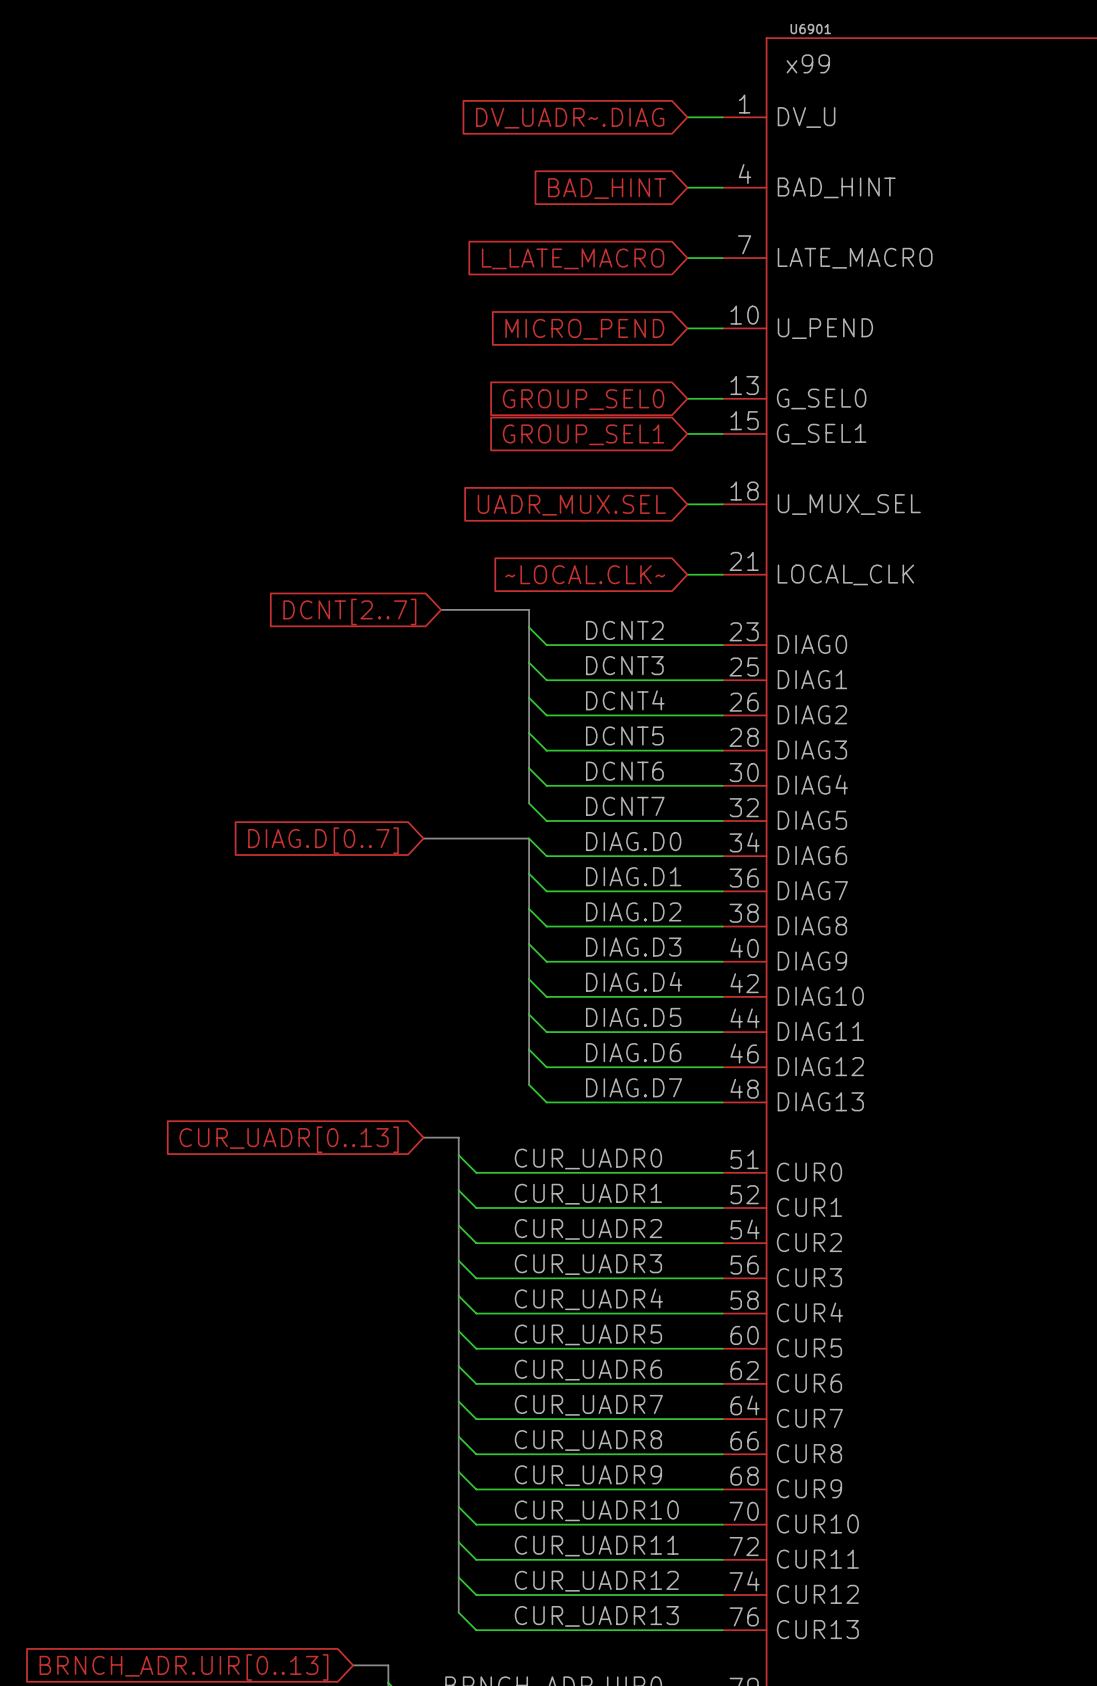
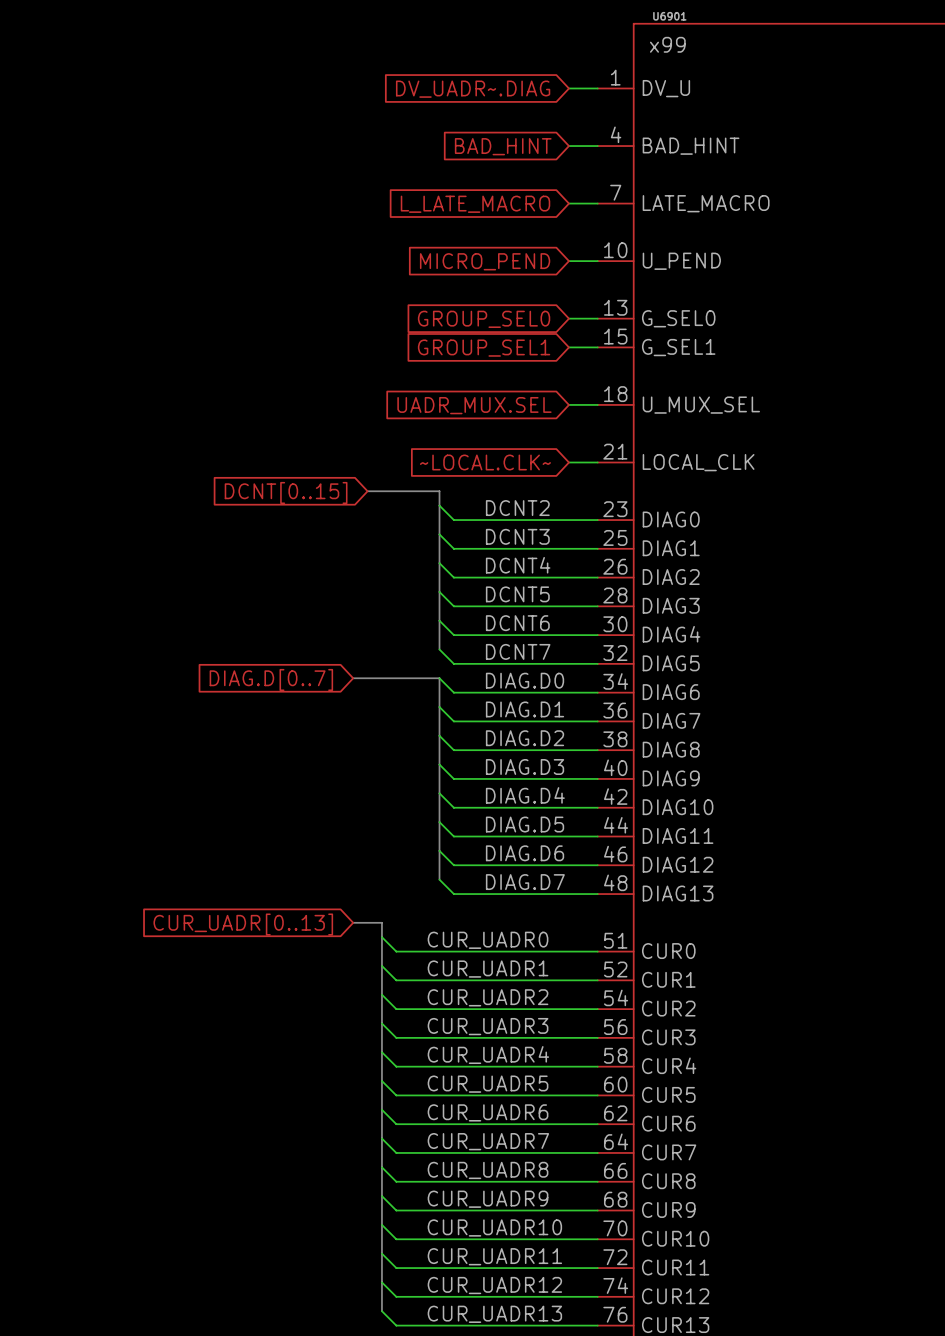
global label: DCNT[2..7] (349, 611) -> DCNT[0..15] (286, 492)

